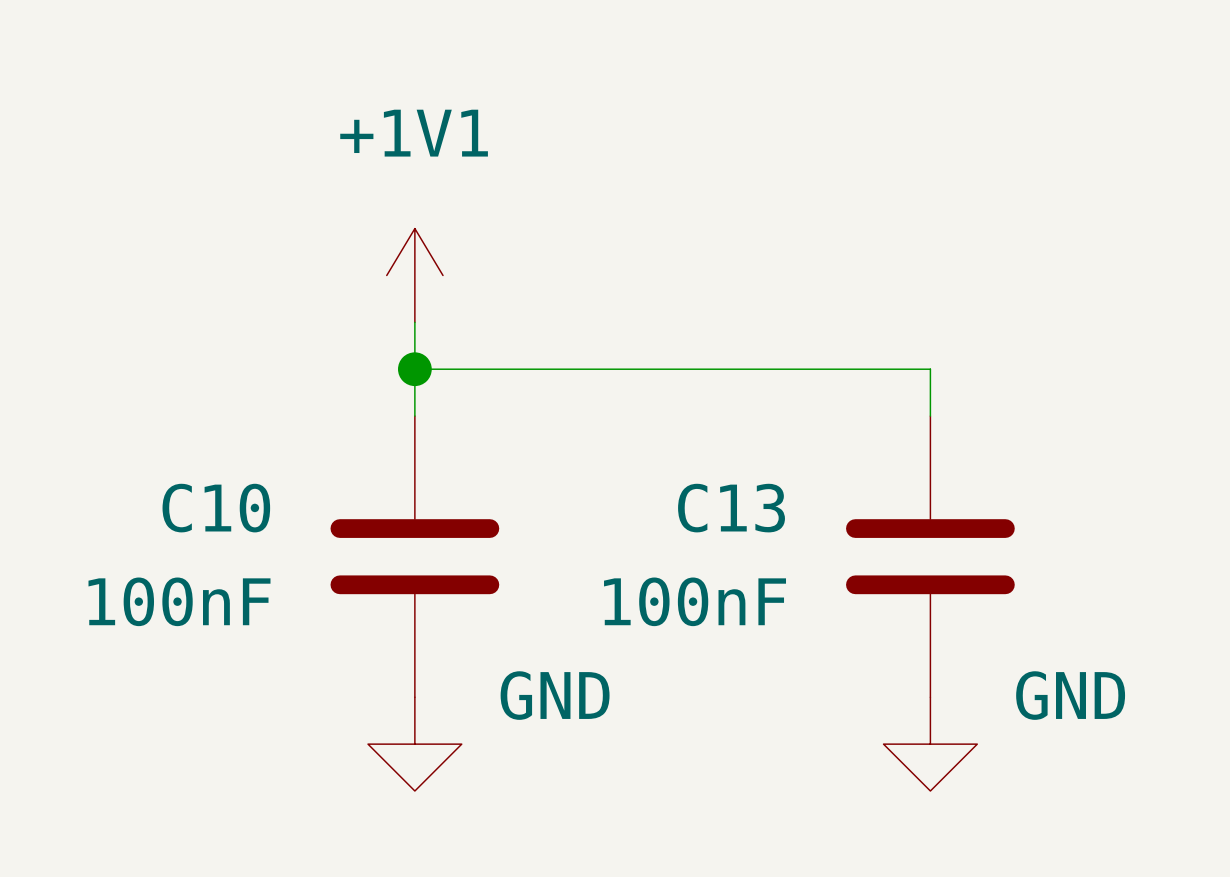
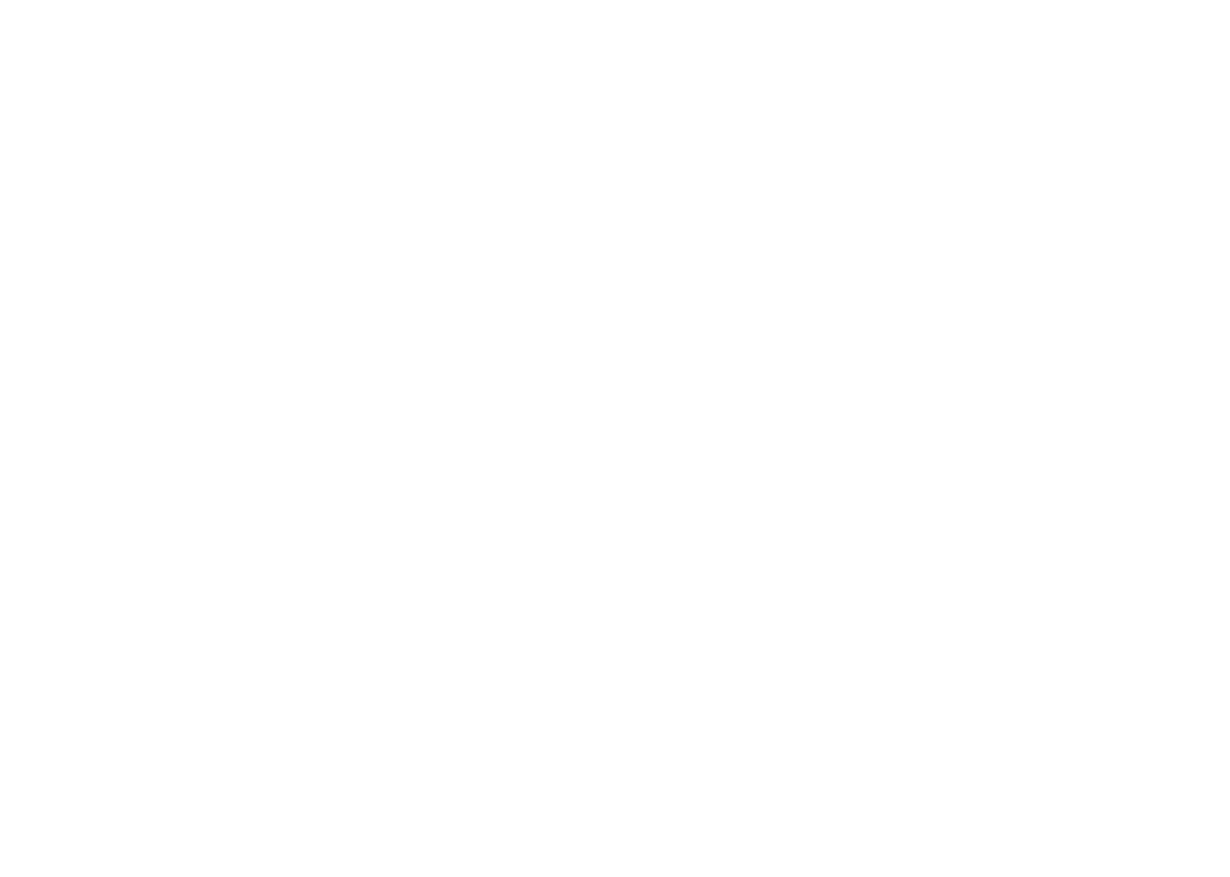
power symbol: +1V1 (414, 275) -> none
wire: (414, 322) (414, 416) -> none
wire: (414, 369) (930, 369) (930, 416) -> none
junction: (414, 369) -> none
C10: 100nF (414, 556) -> none
C13: 100nF (930, 556) -> none
power symbol: GND (414, 744) -> none
power symbol: GND (930, 744) -> none

